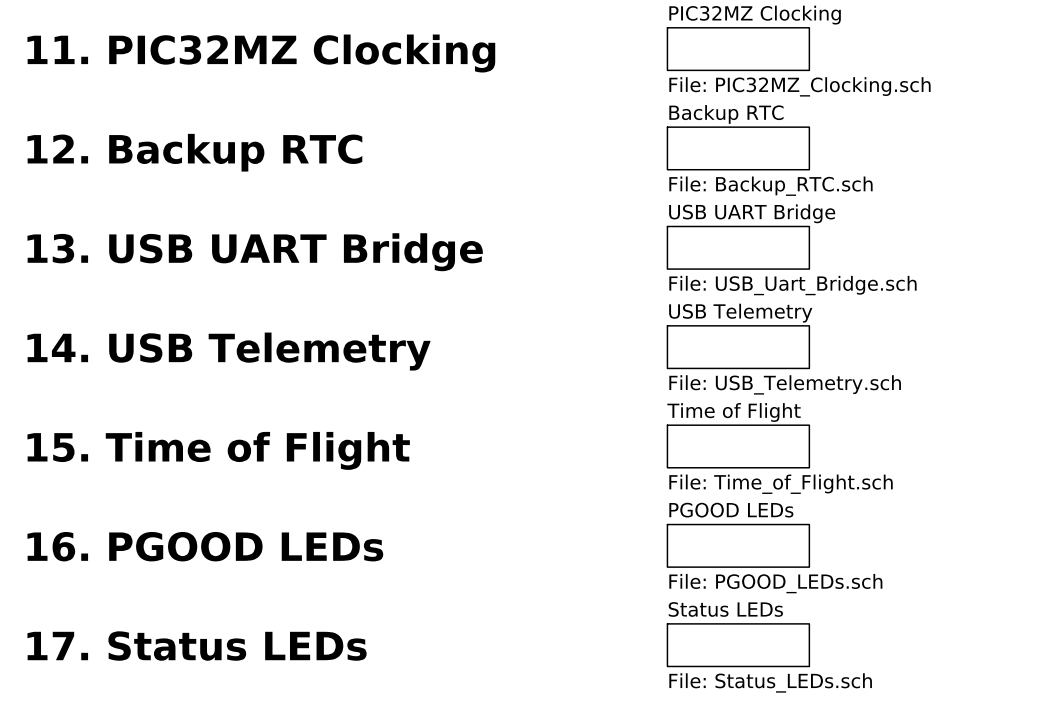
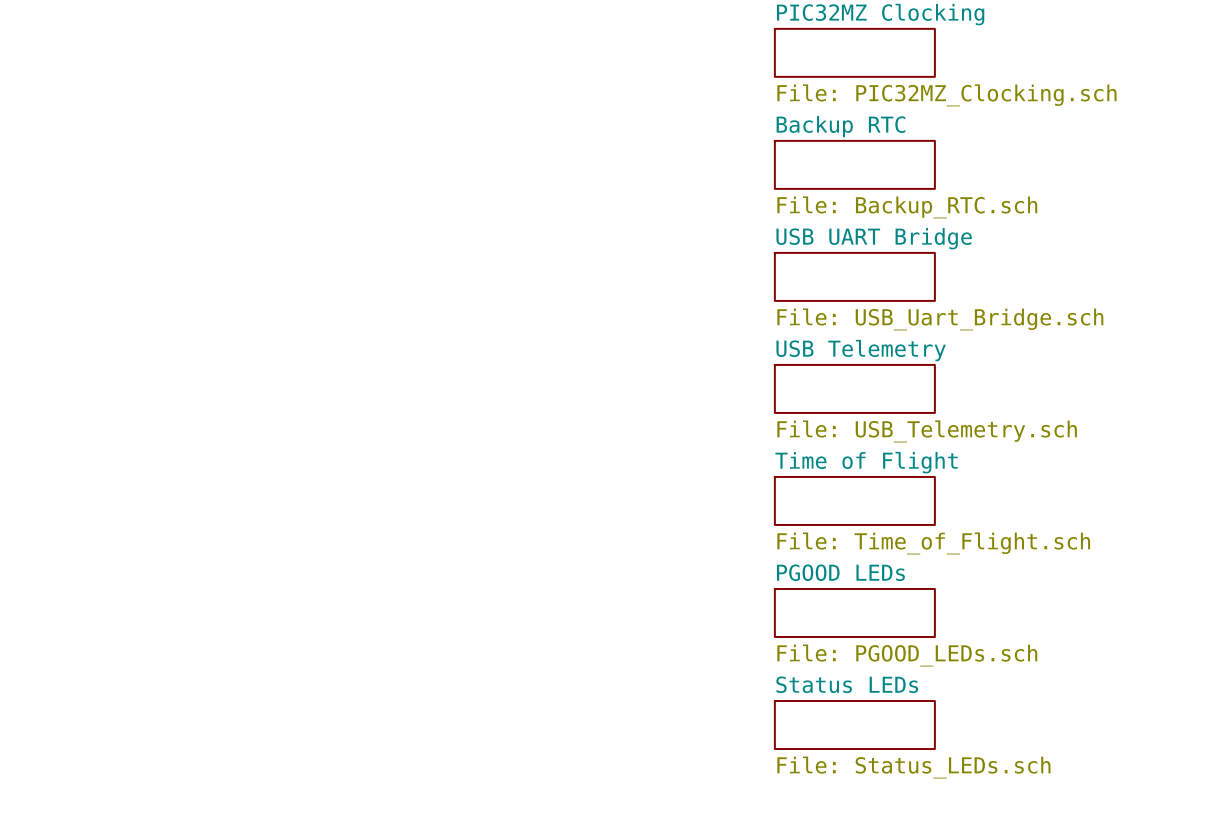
text: 11. PIC32MZ Clocking (261, 53) -> none
text: 12. Backup RTC (194, 152) -> none
text: 13. USB UART Bridge (255, 252) -> none
text: 14. USB Telemetry (229, 351) -> none
text: 15. Time of Flight (218, 450) -> none
text: 16. PGOOD LEDs (205, 546) -> none
text: 17. Status LEDs (197, 646) -> none

